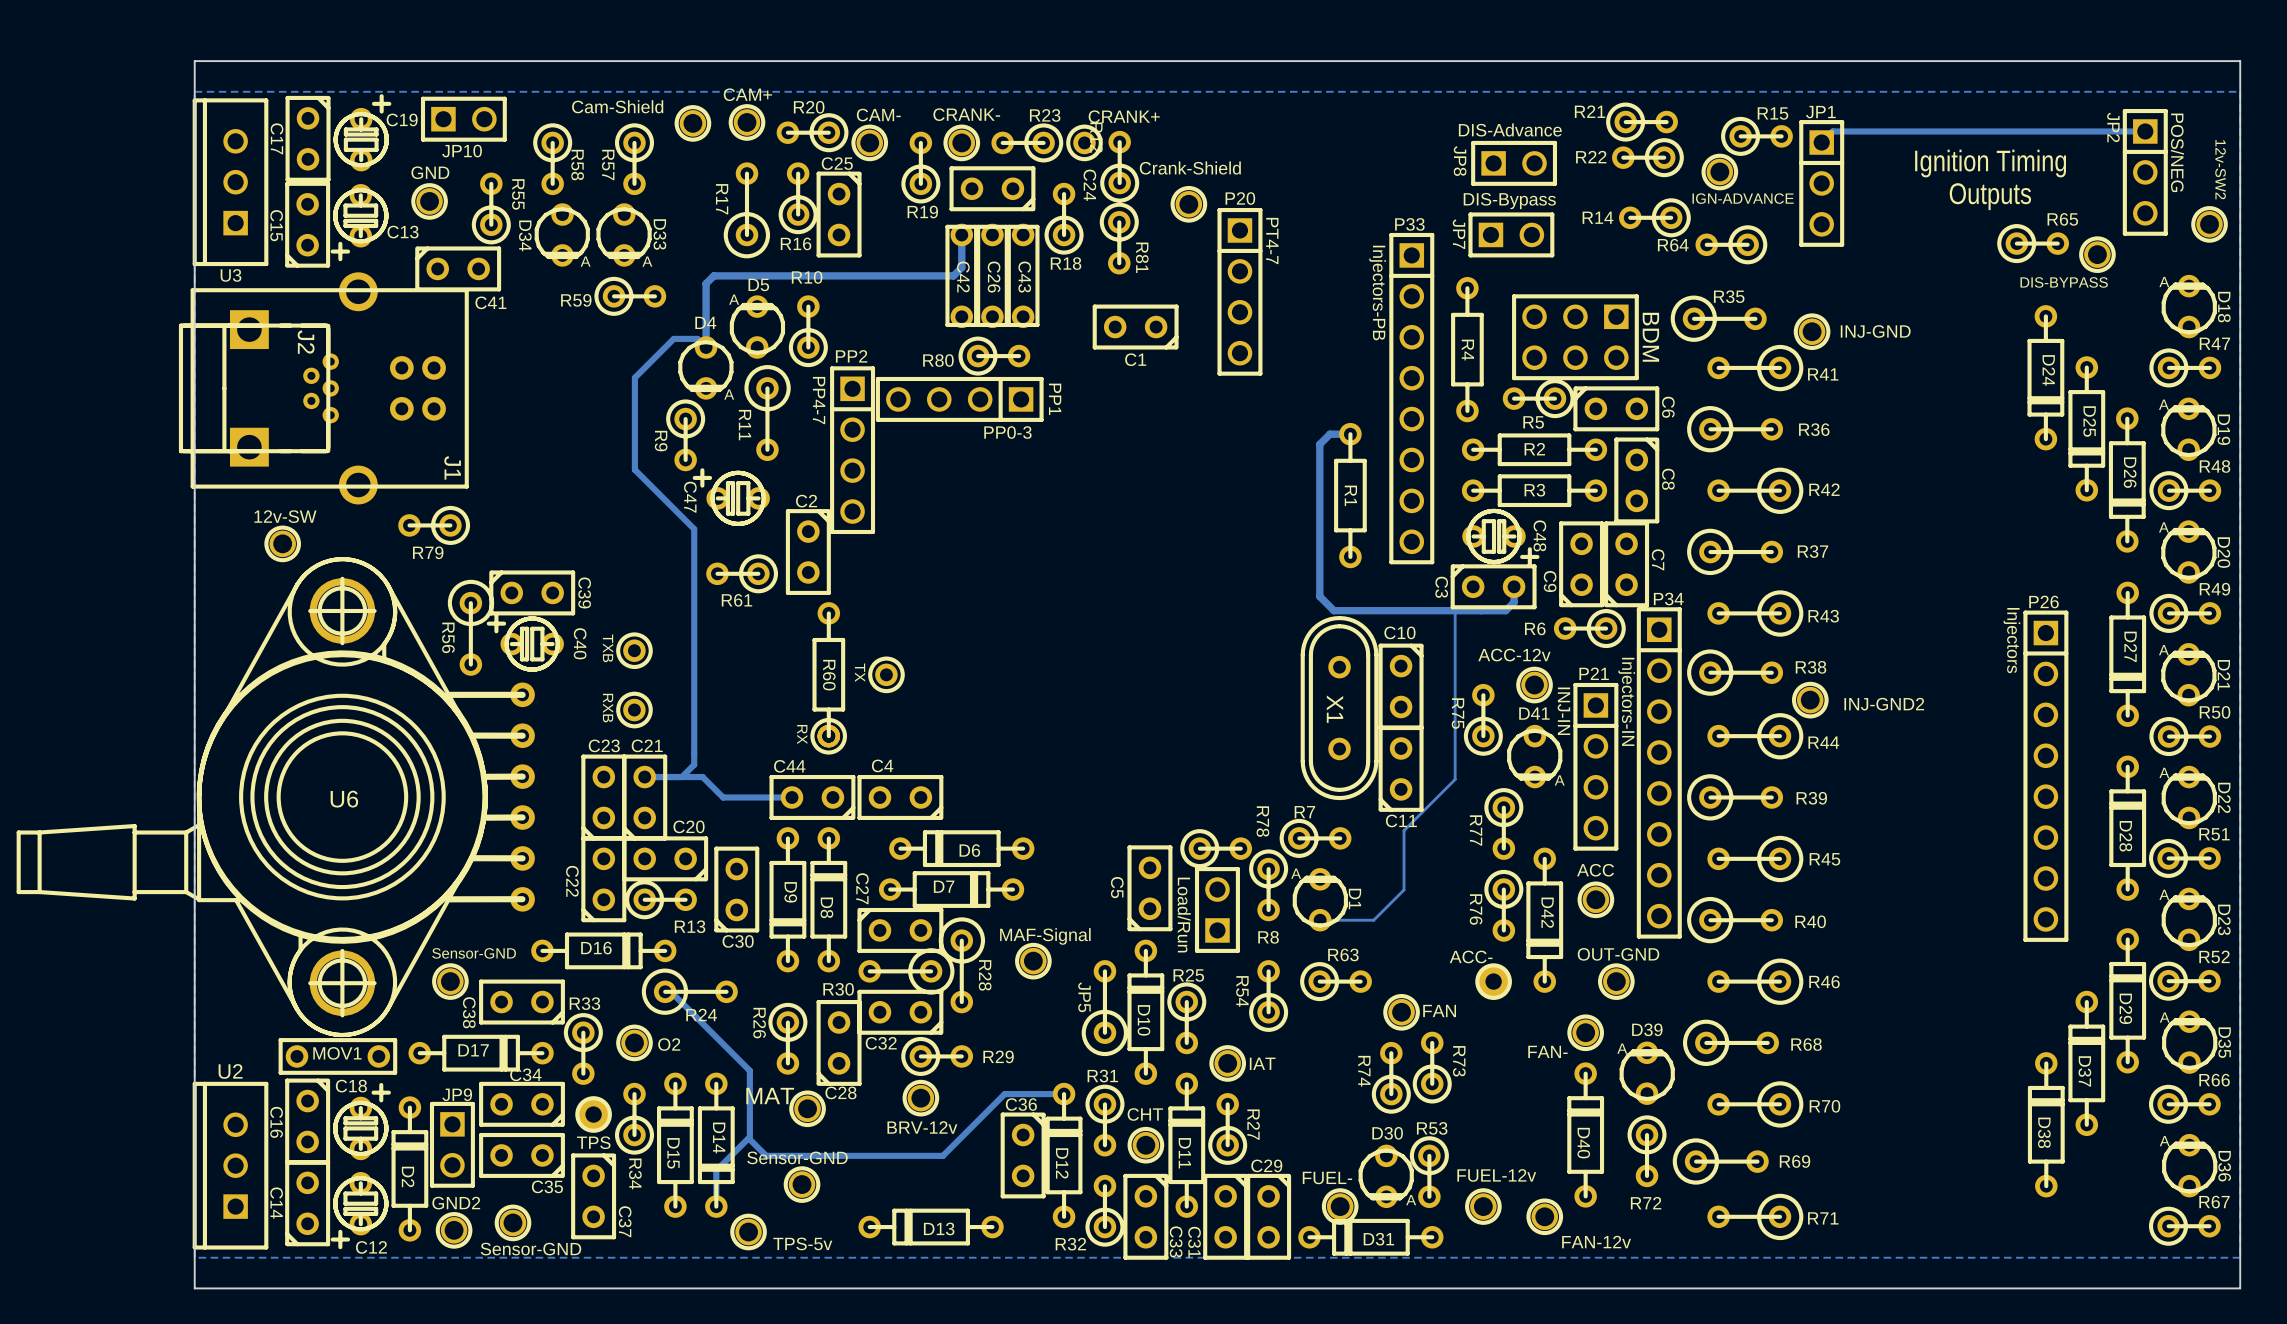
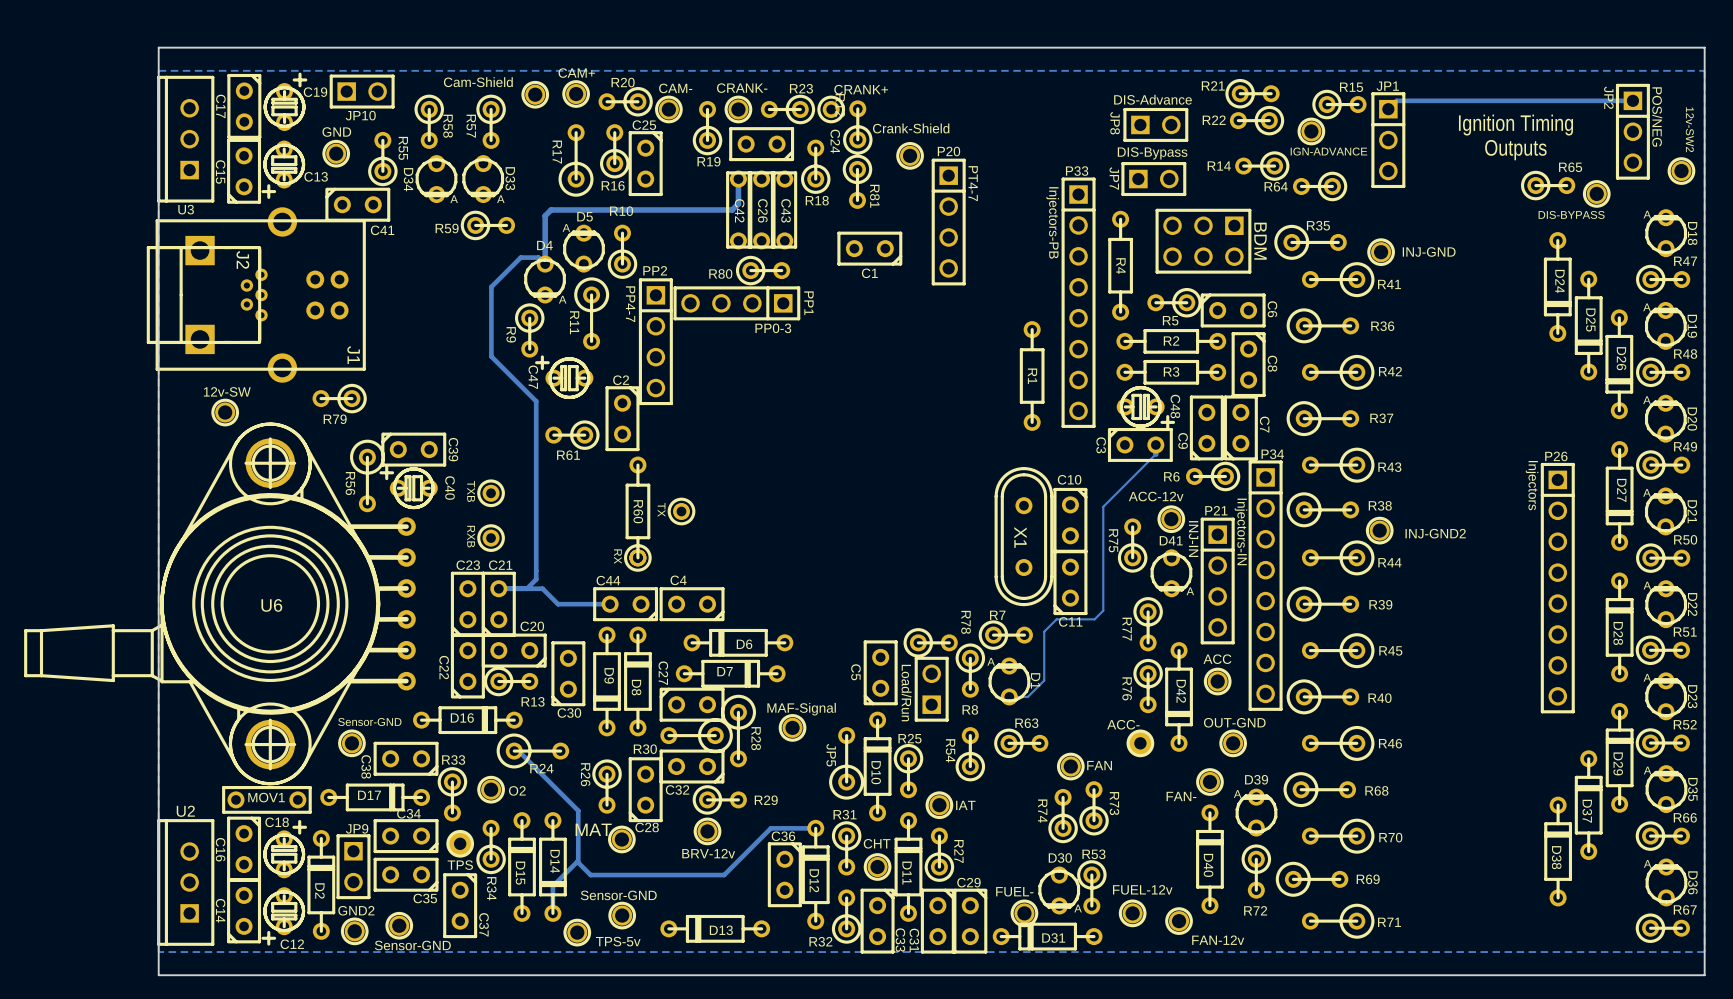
part position: (1575, 337) -> (1203, 241)
track: (1350, 434) (1329, 434) (1319, 444) (1319, 596) (1333, 610) (1505, 610) (1514, 602) (1514, 599) -> none
track: (1455, 610) (1455, 779) (1404, 830) (1404, 889) (1373, 920) (1344, 920) -> (1155, 454) (1103, 506) (1103, 610) (1094, 619) (1056, 619) (1044, 631) (1044, 680) (1027, 696)
part position: (802, 1184) -> (622, 915)

